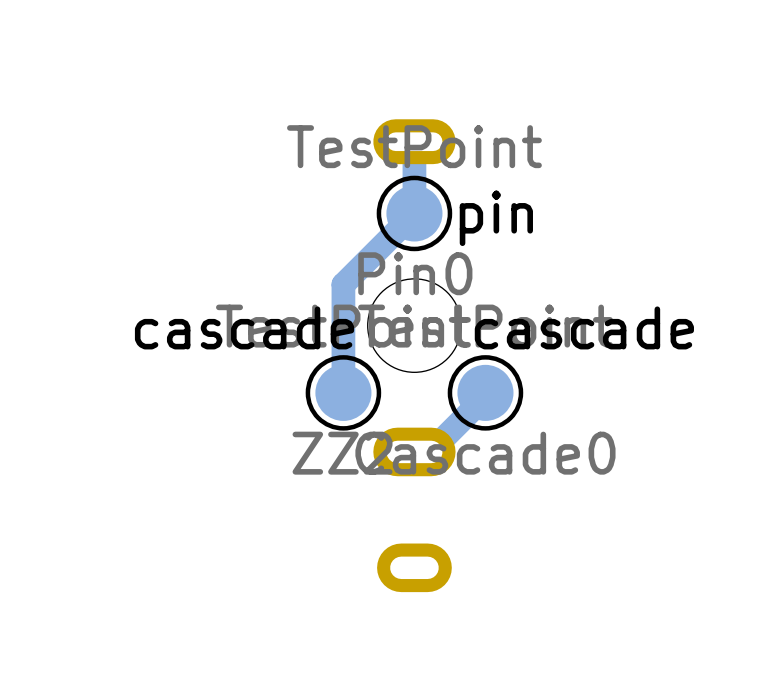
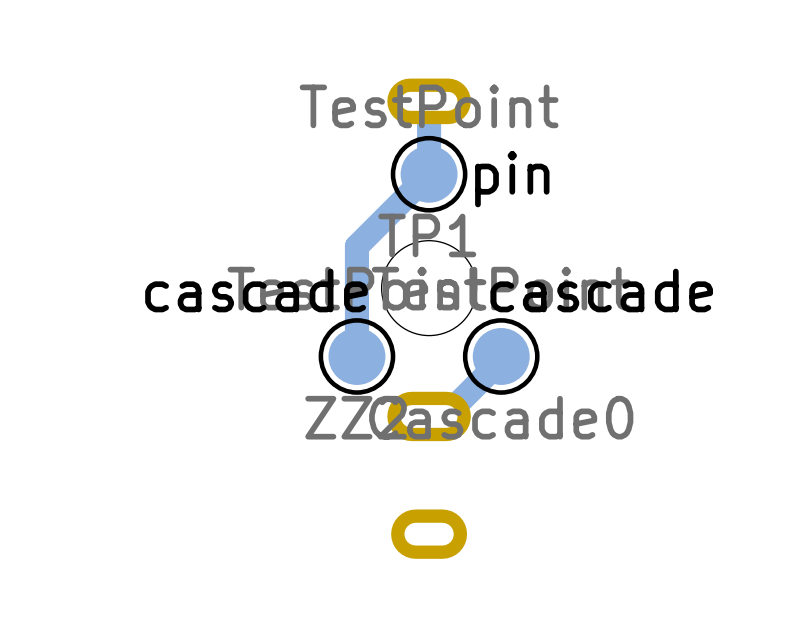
Pin0 name: Pin0 (415, 273) -> TP1 (427, 235)

